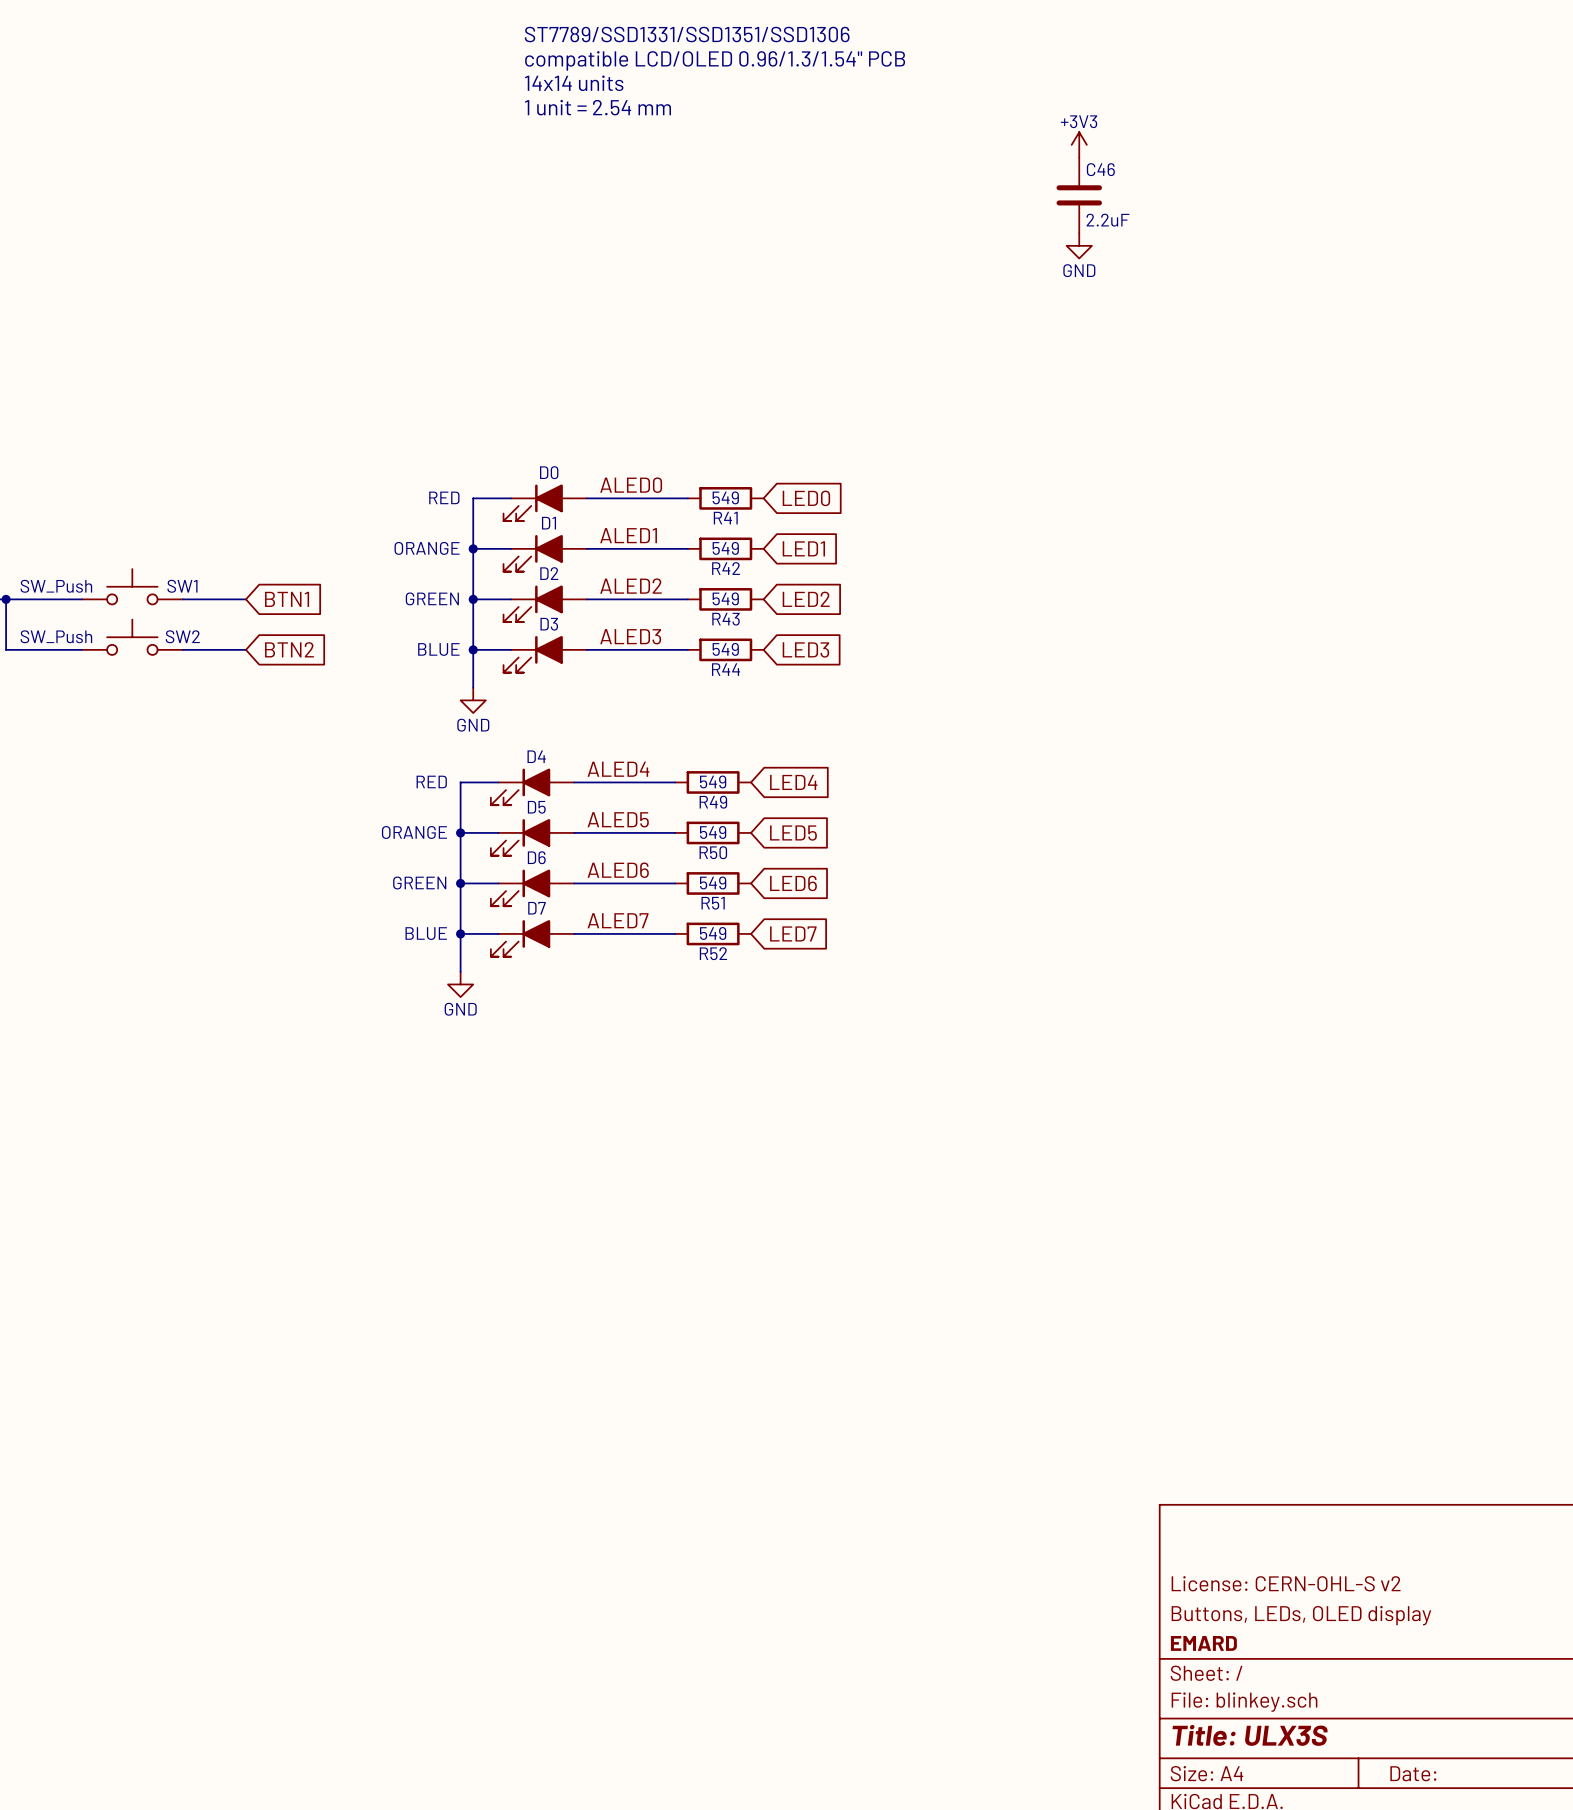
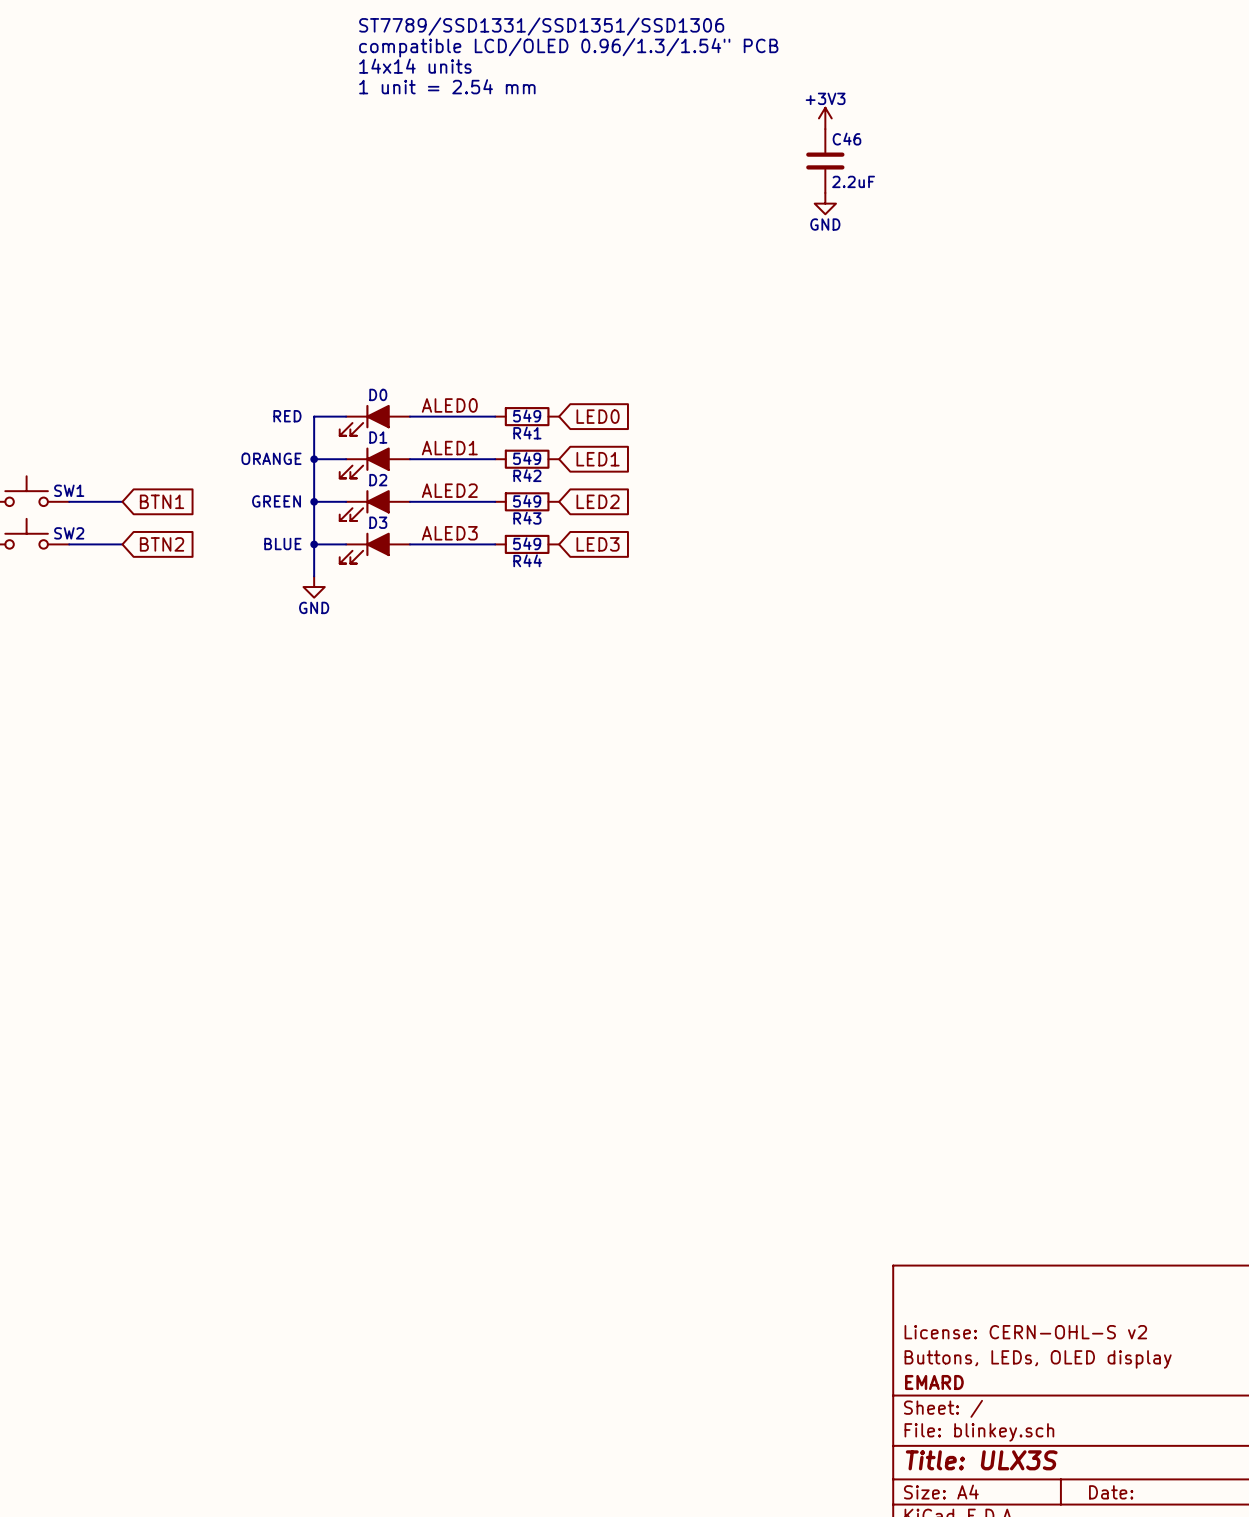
label: ALED4 (618, 769) -> none
wire: (498, 782) (460, 782) (460, 971) -> none
wire: (574, 782) (675, 782) -> none
R49: 549 (713, 782) -> none
global label: LED4 (793, 782) -> none
D4: RED (532, 786) -> none
label: ALED5 (618, 819) -> none
wire: (460, 832) (498, 832) -> none
junction: (460, 832) -> none
wire: (574, 832) (675, 832) -> none
R50: 549 (713, 832) -> none
global label: LED5 (793, 833) -> none
D5: ORANGE (532, 837) -> none
label: ALED6 (618, 870) -> none
wire: (460, 883) (498, 883) -> none
junction: (460, 883) -> none
wire: (574, 883) (675, 883) -> none
R51: 549 (713, 883) -> none
global label: LED6 (793, 883) -> none
D6: GREEN (532, 887) -> none
label: ALED7 (618, 920) -> none
wire: (460, 933) (498, 933) -> none
junction: (460, 933) -> none
wire: (574, 933) (675, 933) -> none
R52: 549 (713, 933) -> none
global label: LED7 (793, 933) -> none
D7: BLUE (532, 938) -> none
power symbol: GND (460, 984) -> none

